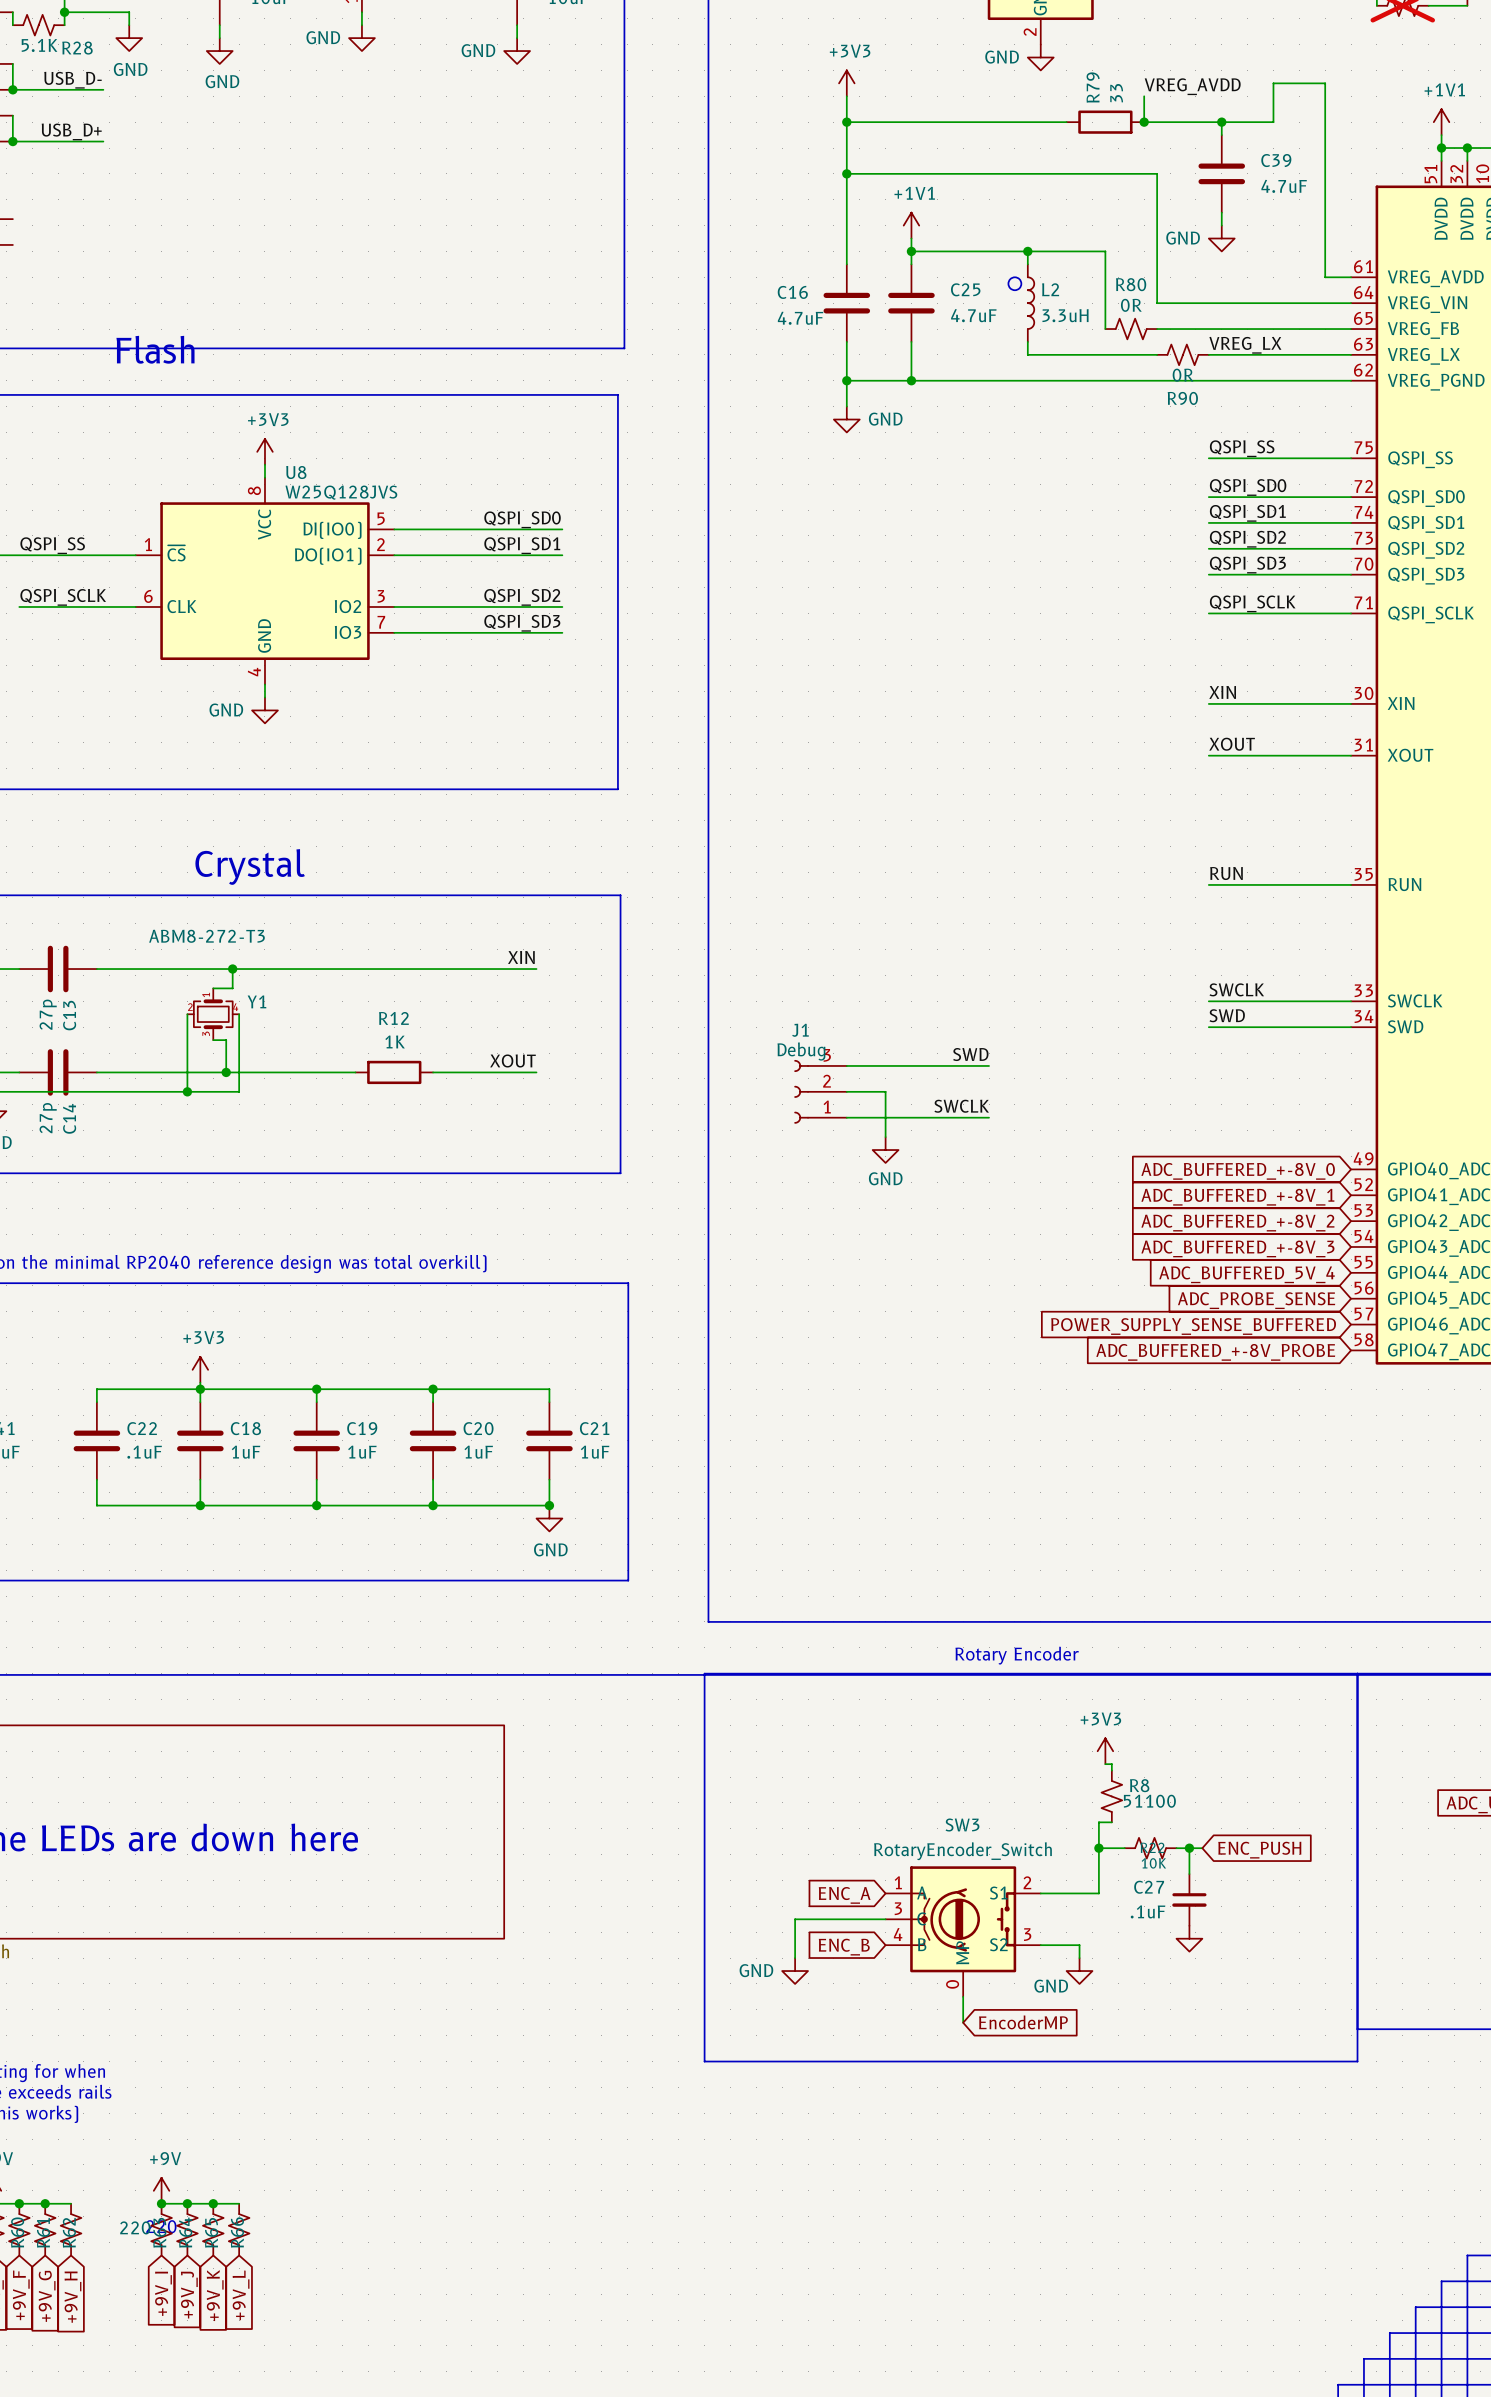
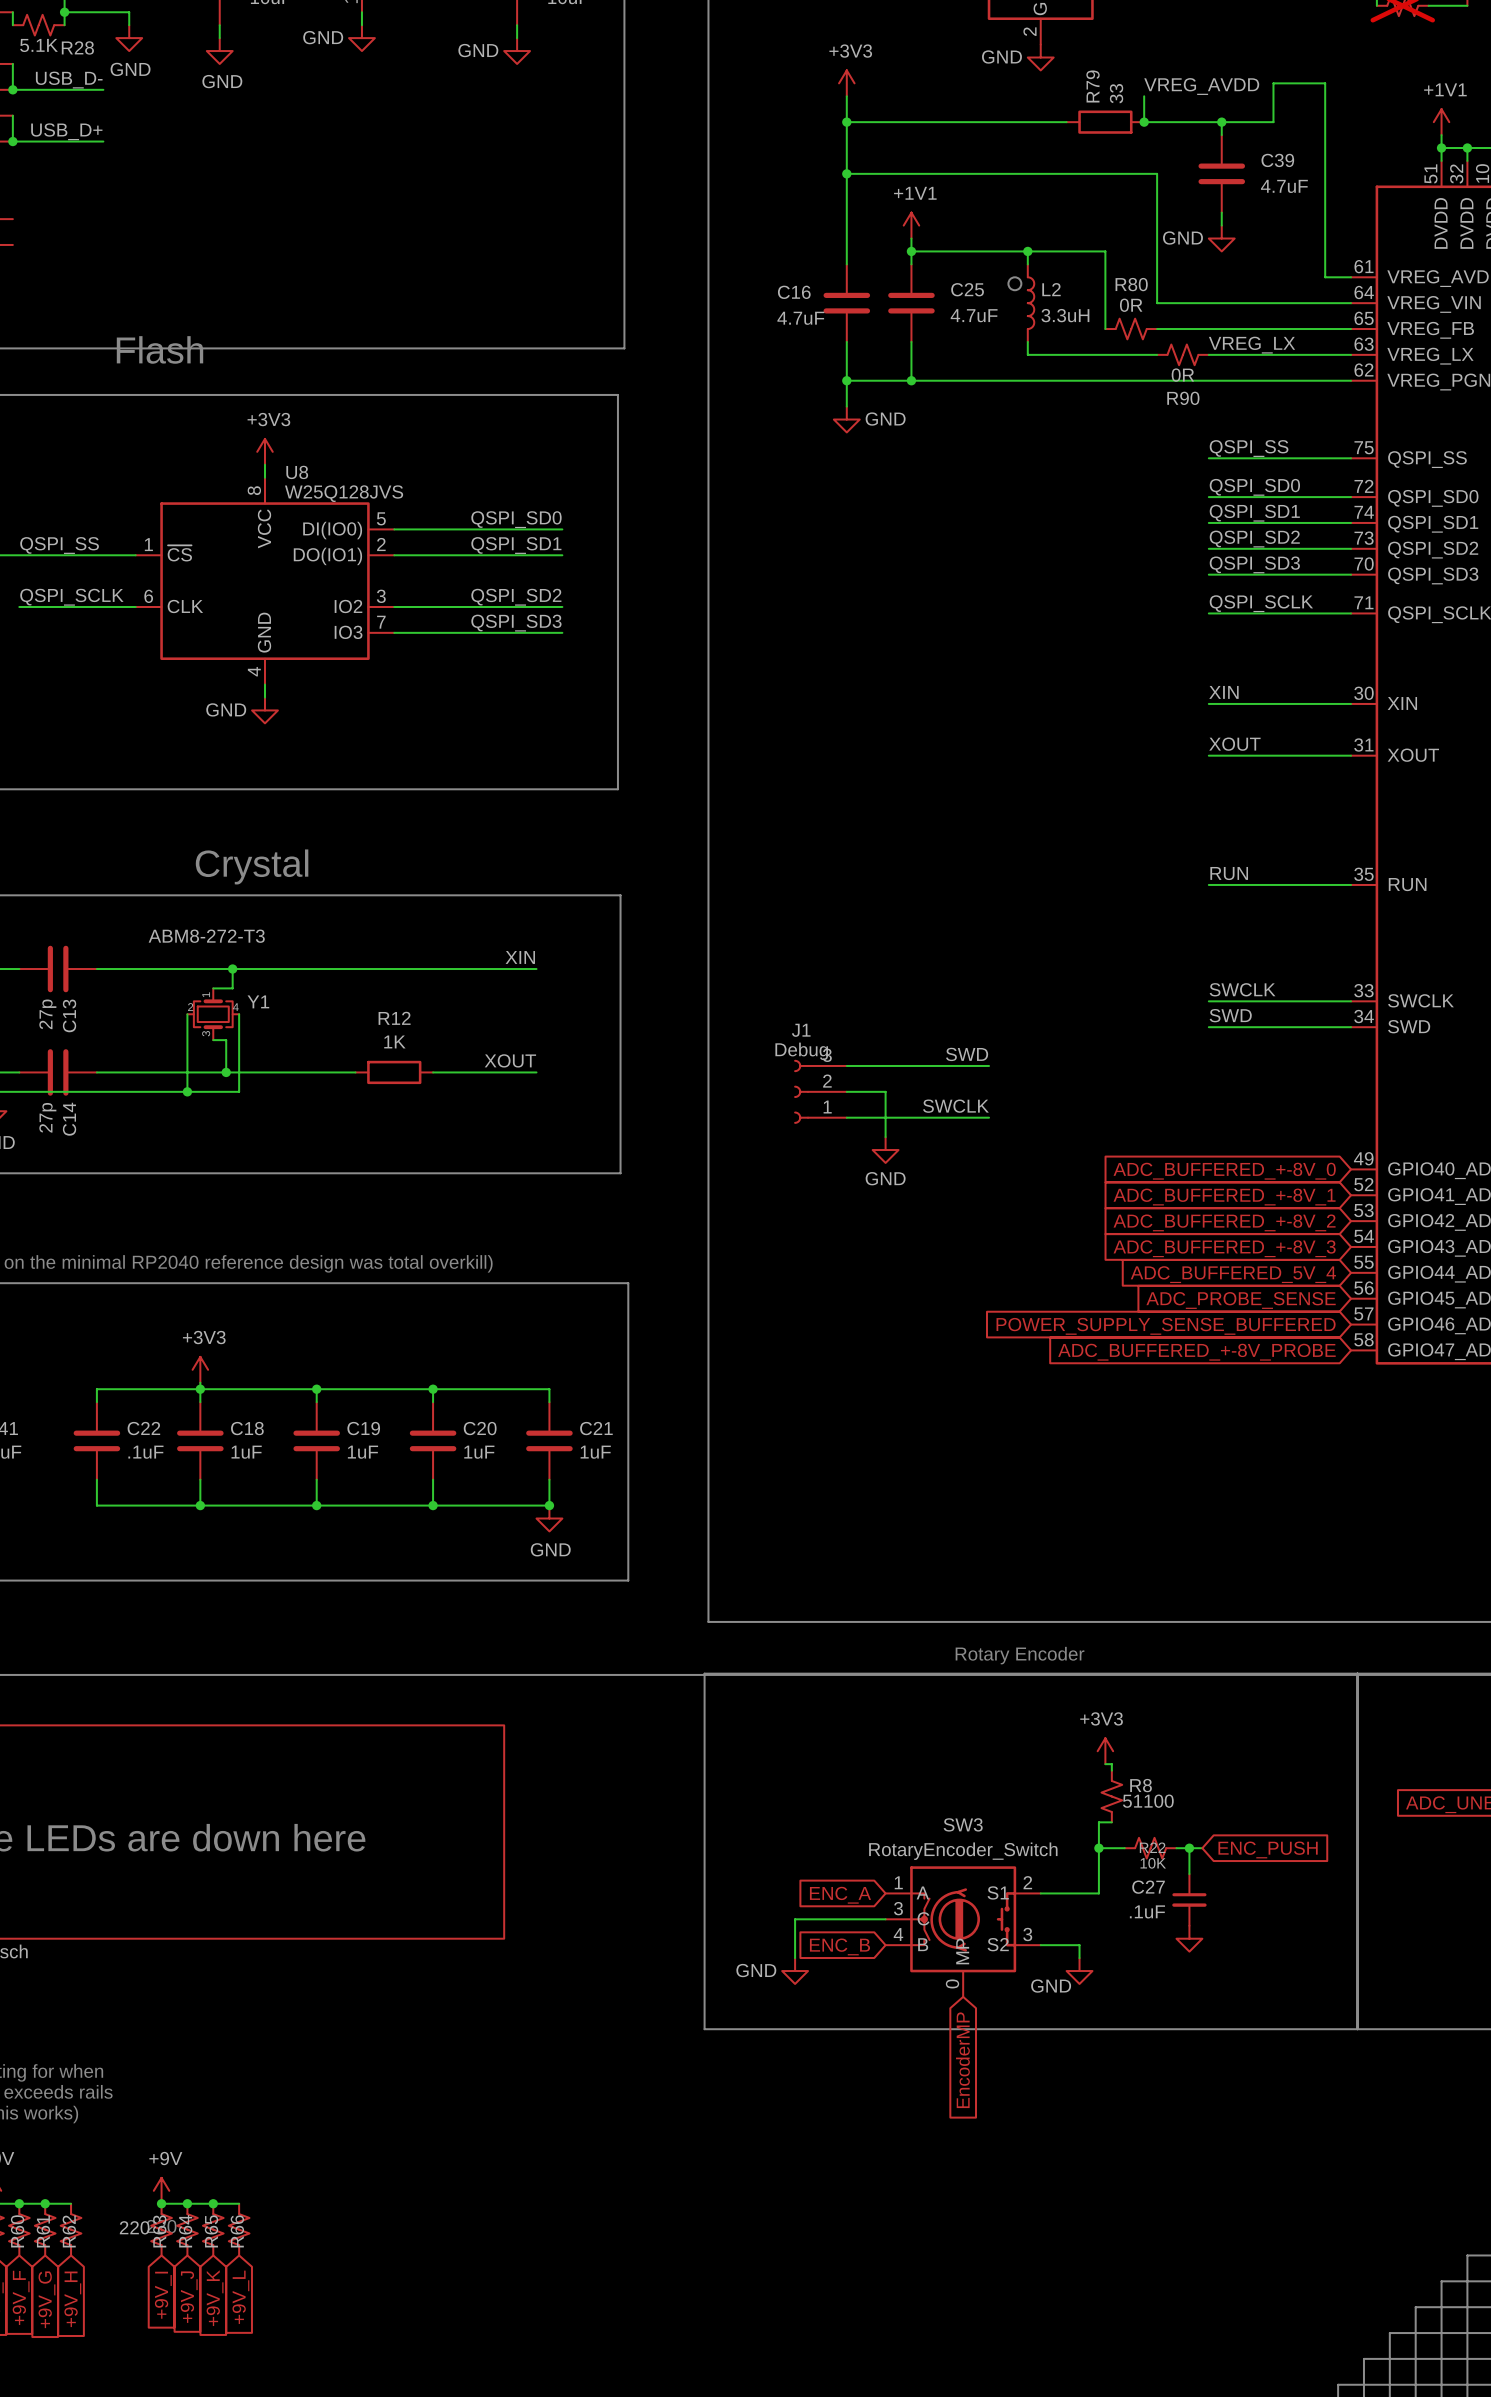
wire: (963, 1996) (963, 2022) -> none
global label rotation: 0° (1023, 2022) -> 90° clockwise (962, 2060)
line: (704, 2029) (704, 2061) (1357, 2061) (1357, 2029) -> (704, 2029) (1357, 2029)

